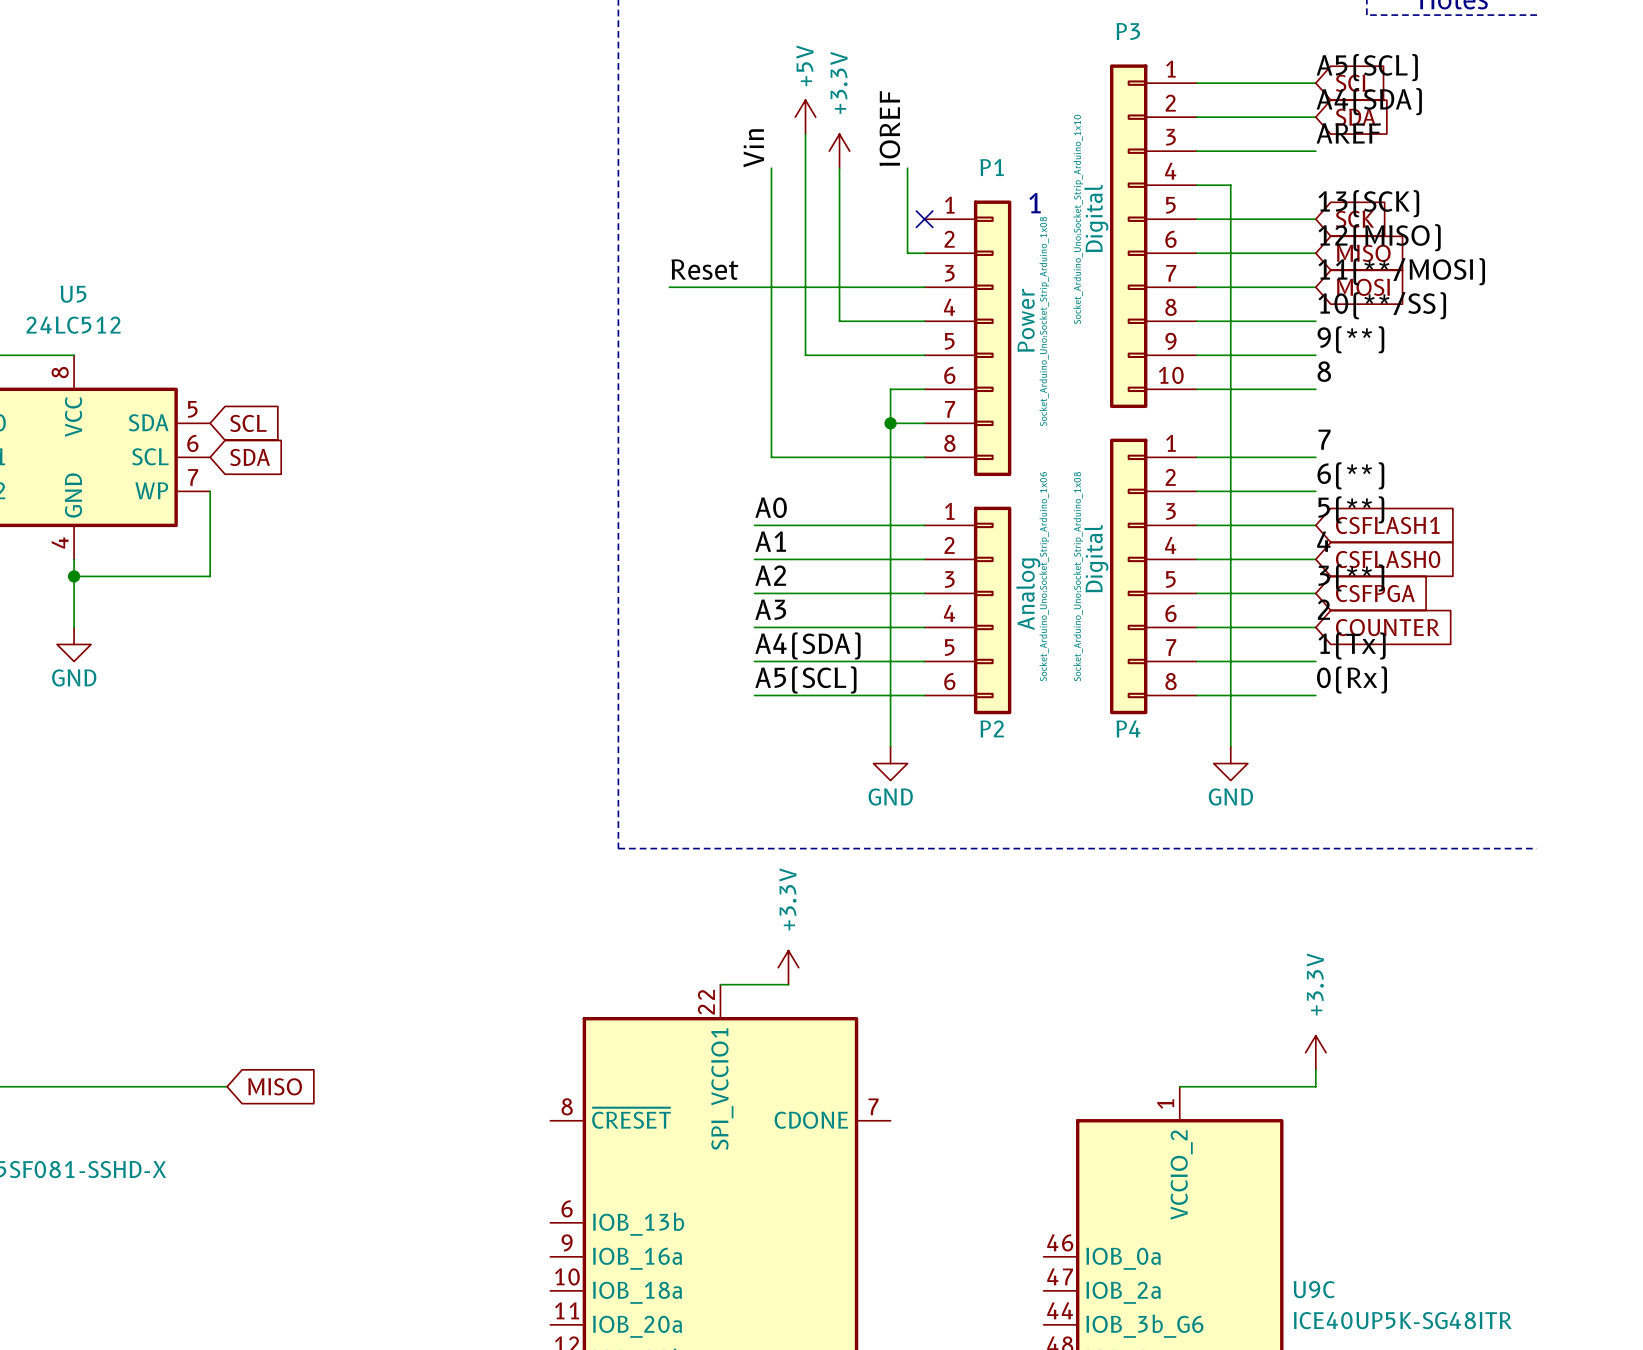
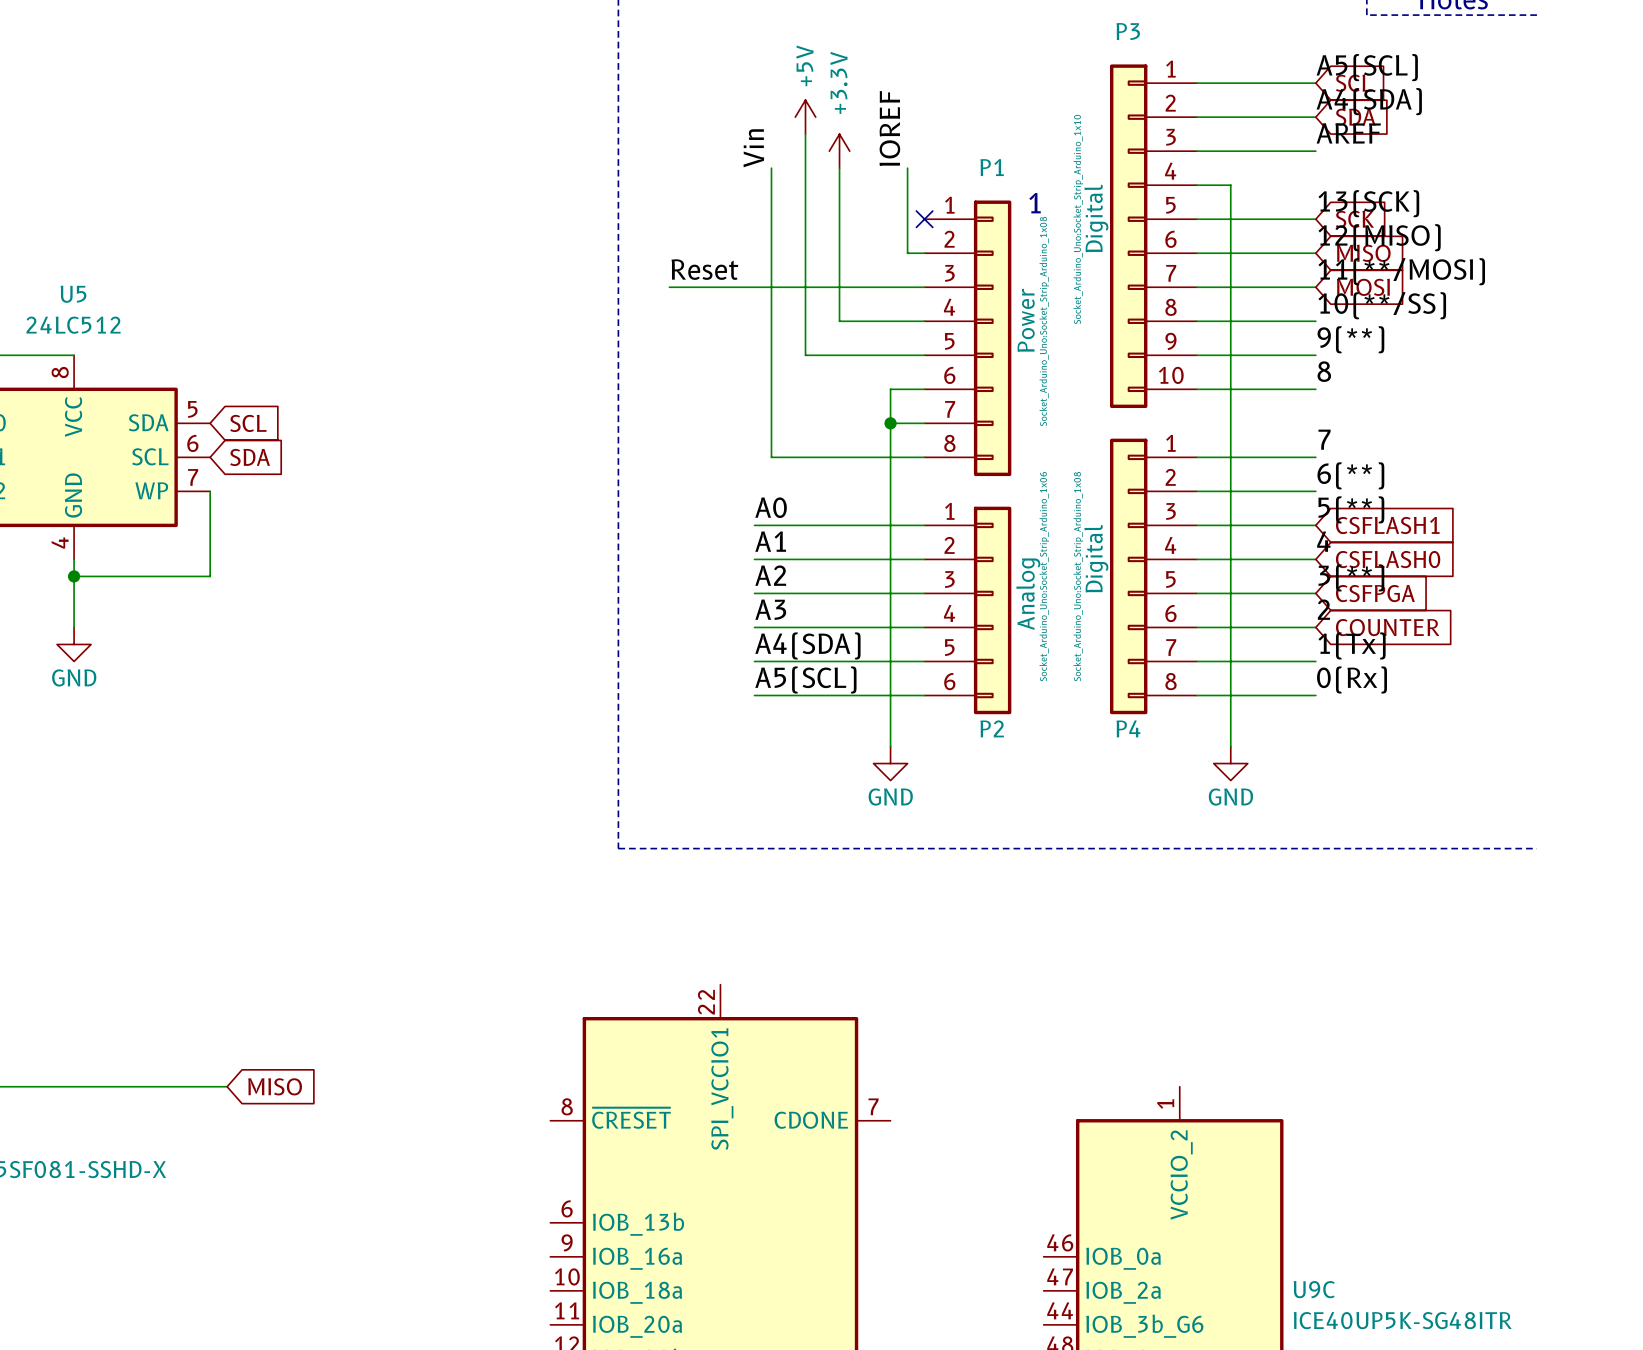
power symbol: +3.3V (788, 967) -> none
wire: (720, 984) (788, 984) -> none
power symbol: +3.3V (1315, 1052) -> none
wire: (1315, 1069) (1315, 1086) (1179, 1086) -> none

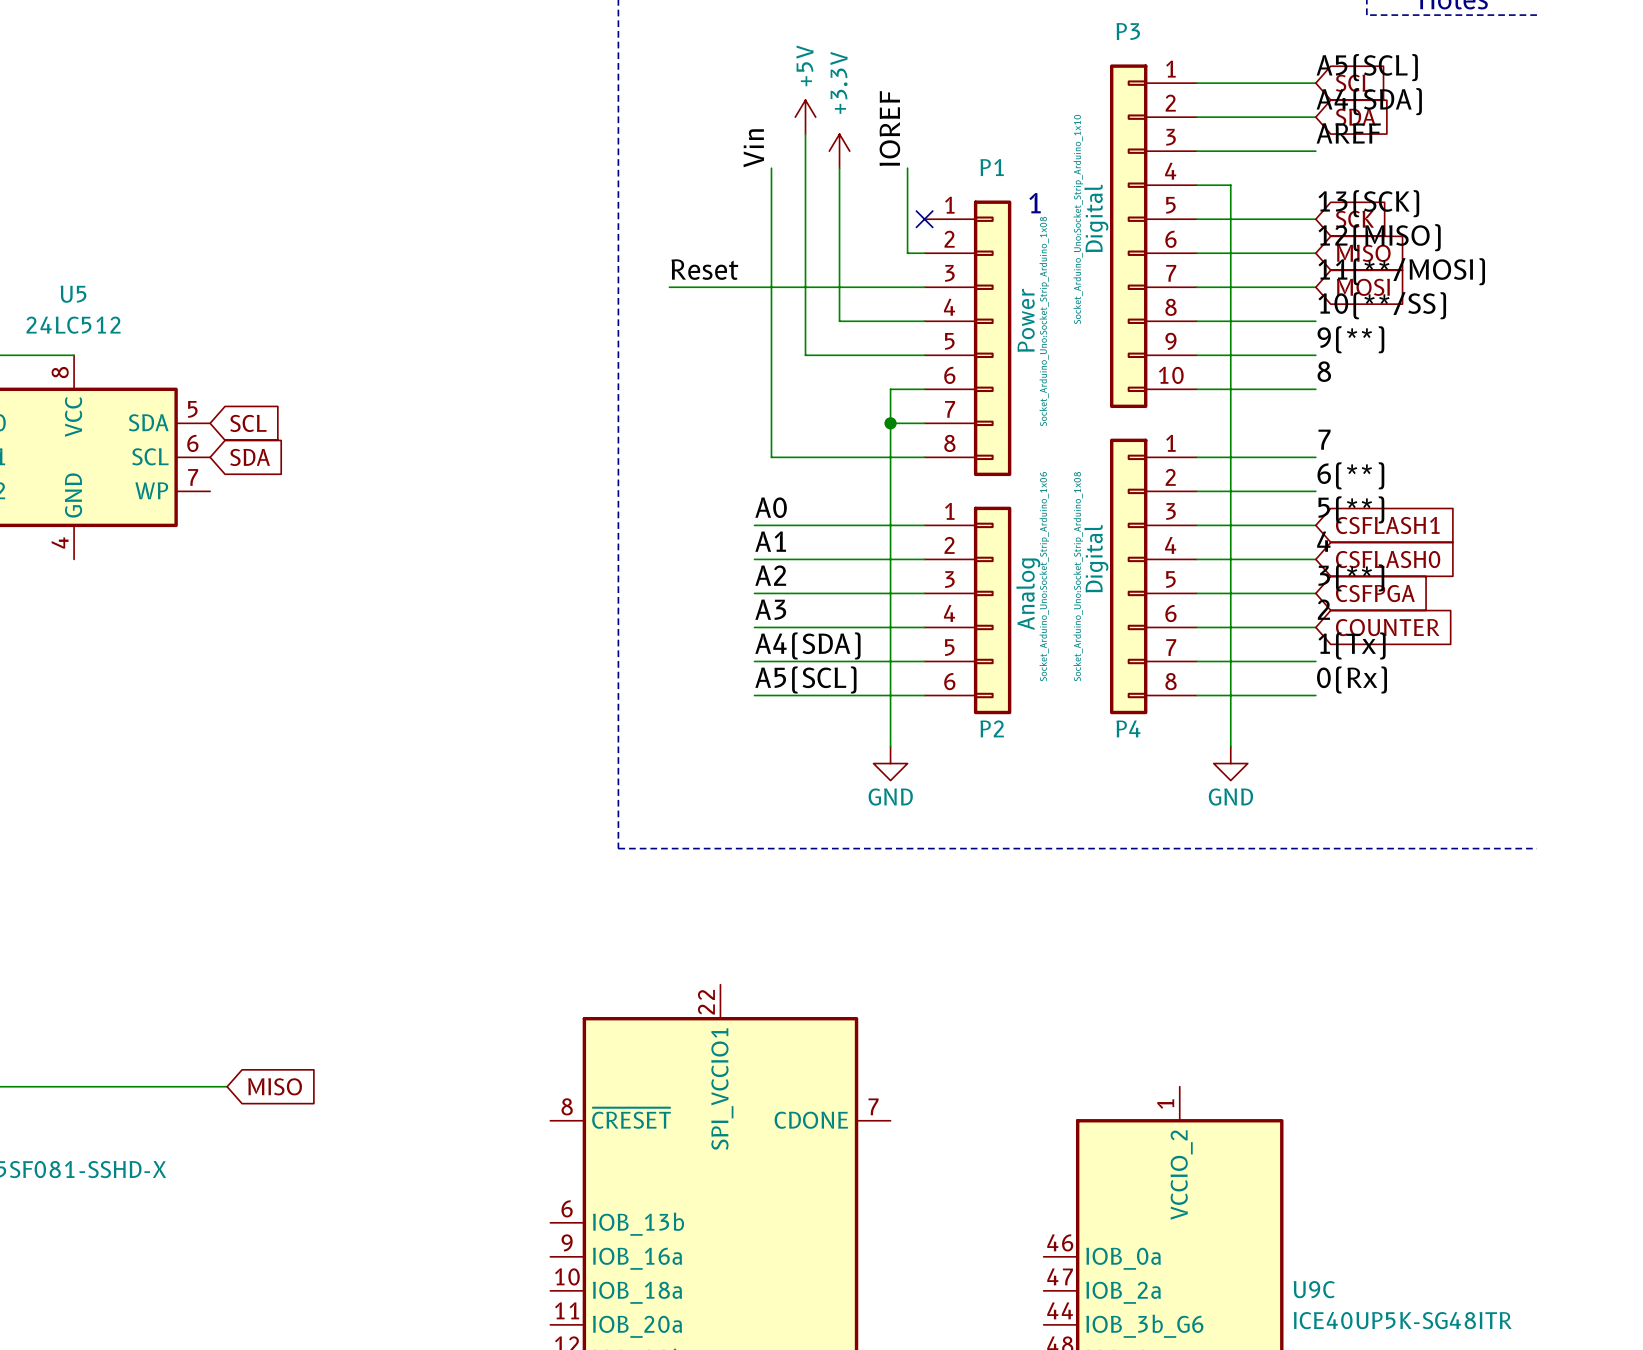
wire: (210, 491) (210, 576) (74, 576) -> none
wire: (74, 559) (74, 627) -> none
junction: (74, 576) -> none
power symbol: GND (74, 644) -> none

